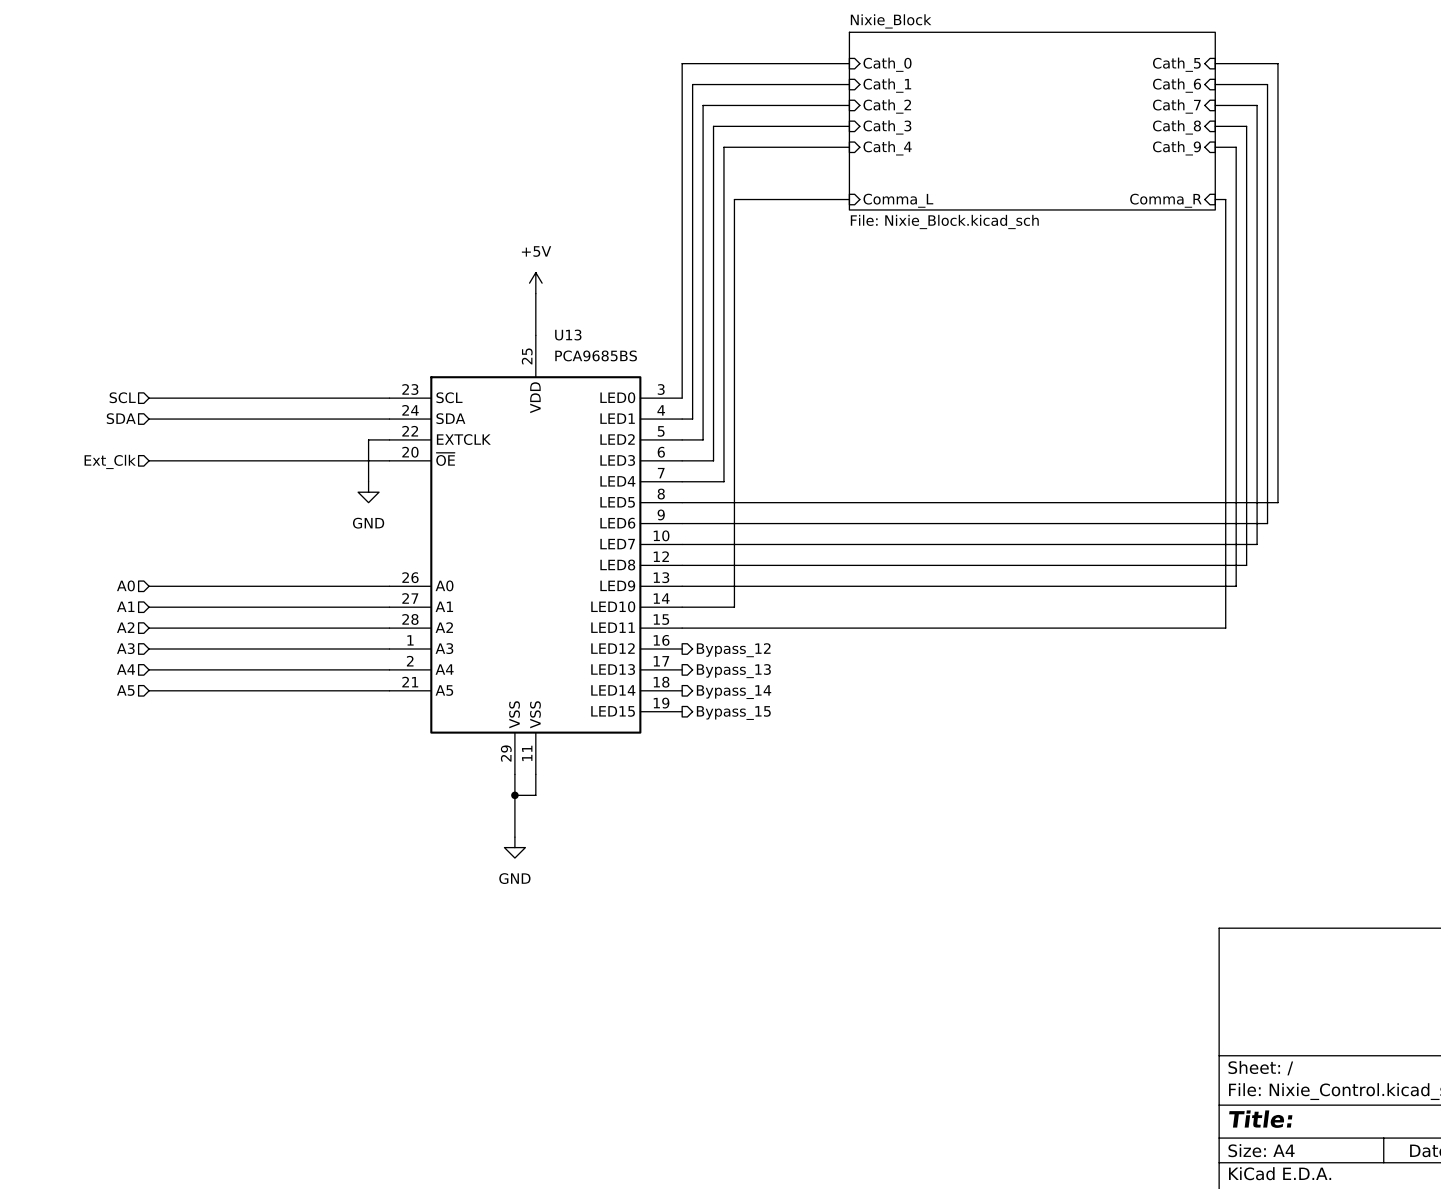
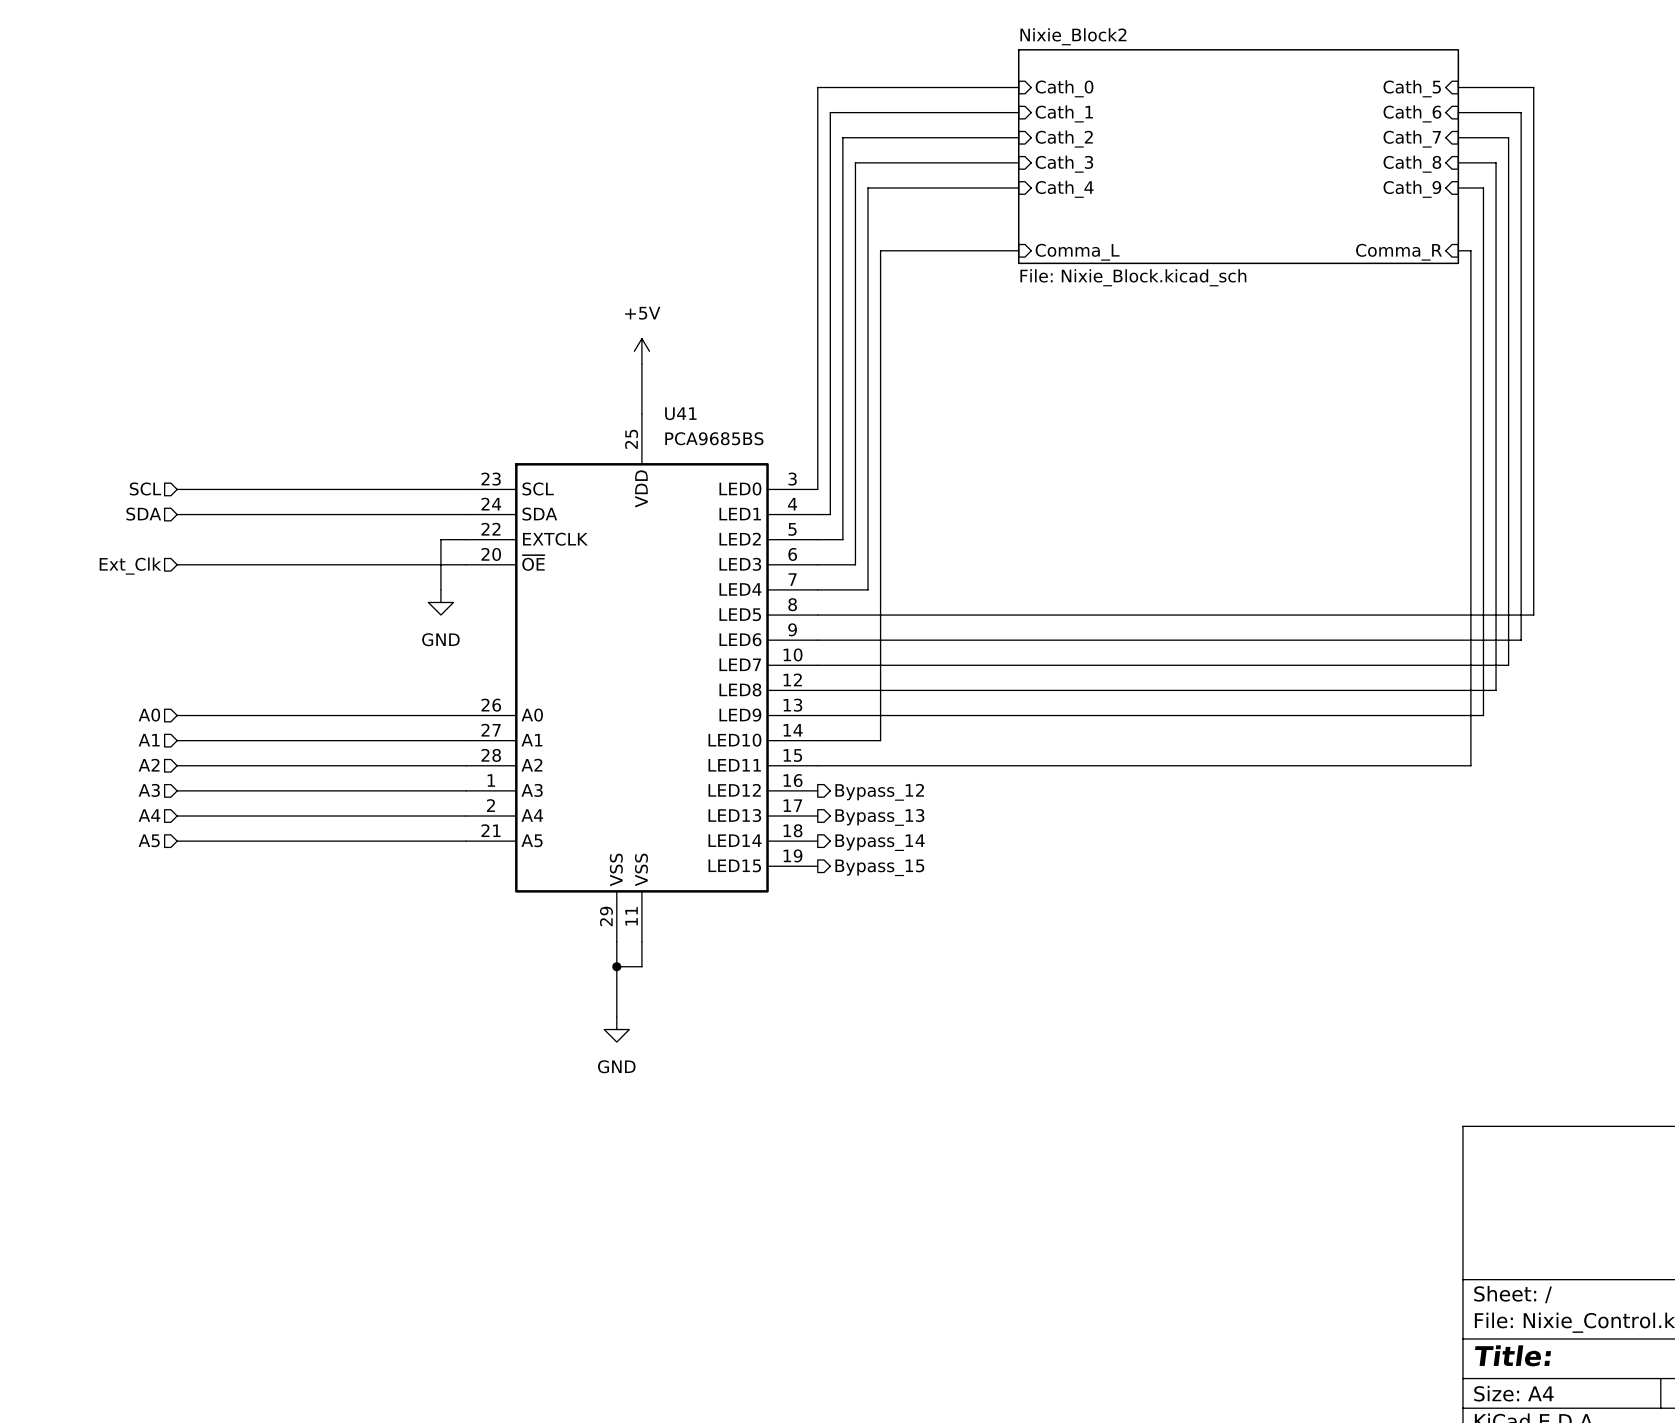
sheet Nixie_Block name: Nixie_Block (891, 21) -> Nixie_Block2 (1073, 36)
U13 name: U13 (568, 335) -> U41 (680, 413)

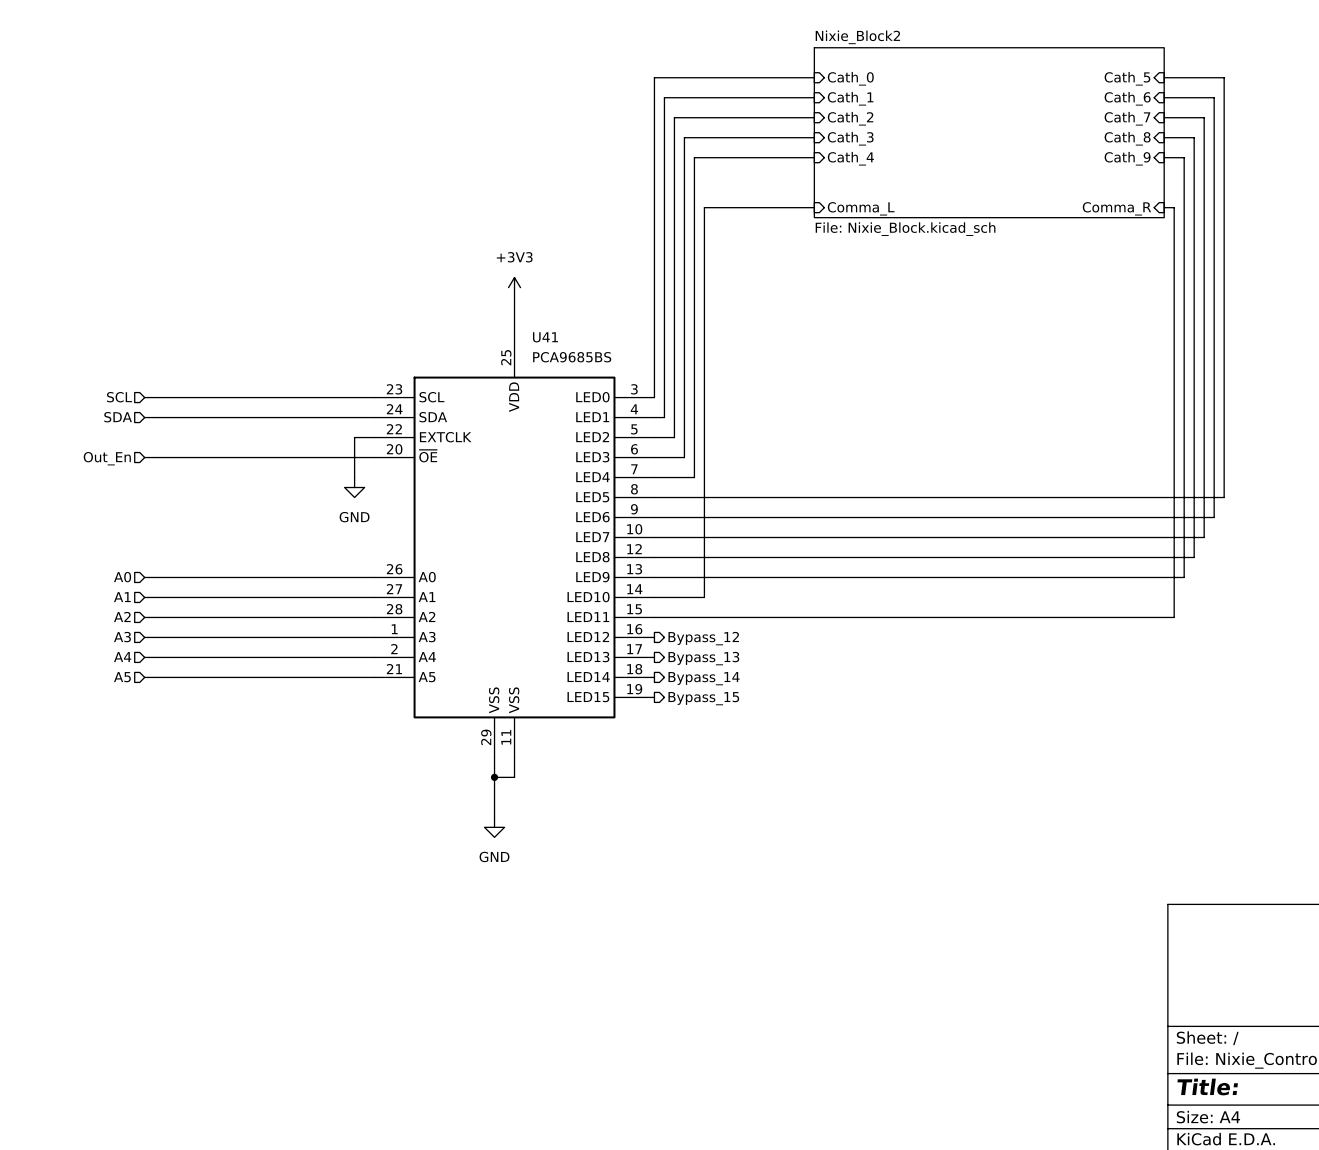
power symbol: +5V (641, 351) -> +3V3 (514, 287)
hierarchical label: Ext_Clk (130, 566) -> Out_En (107, 458)

